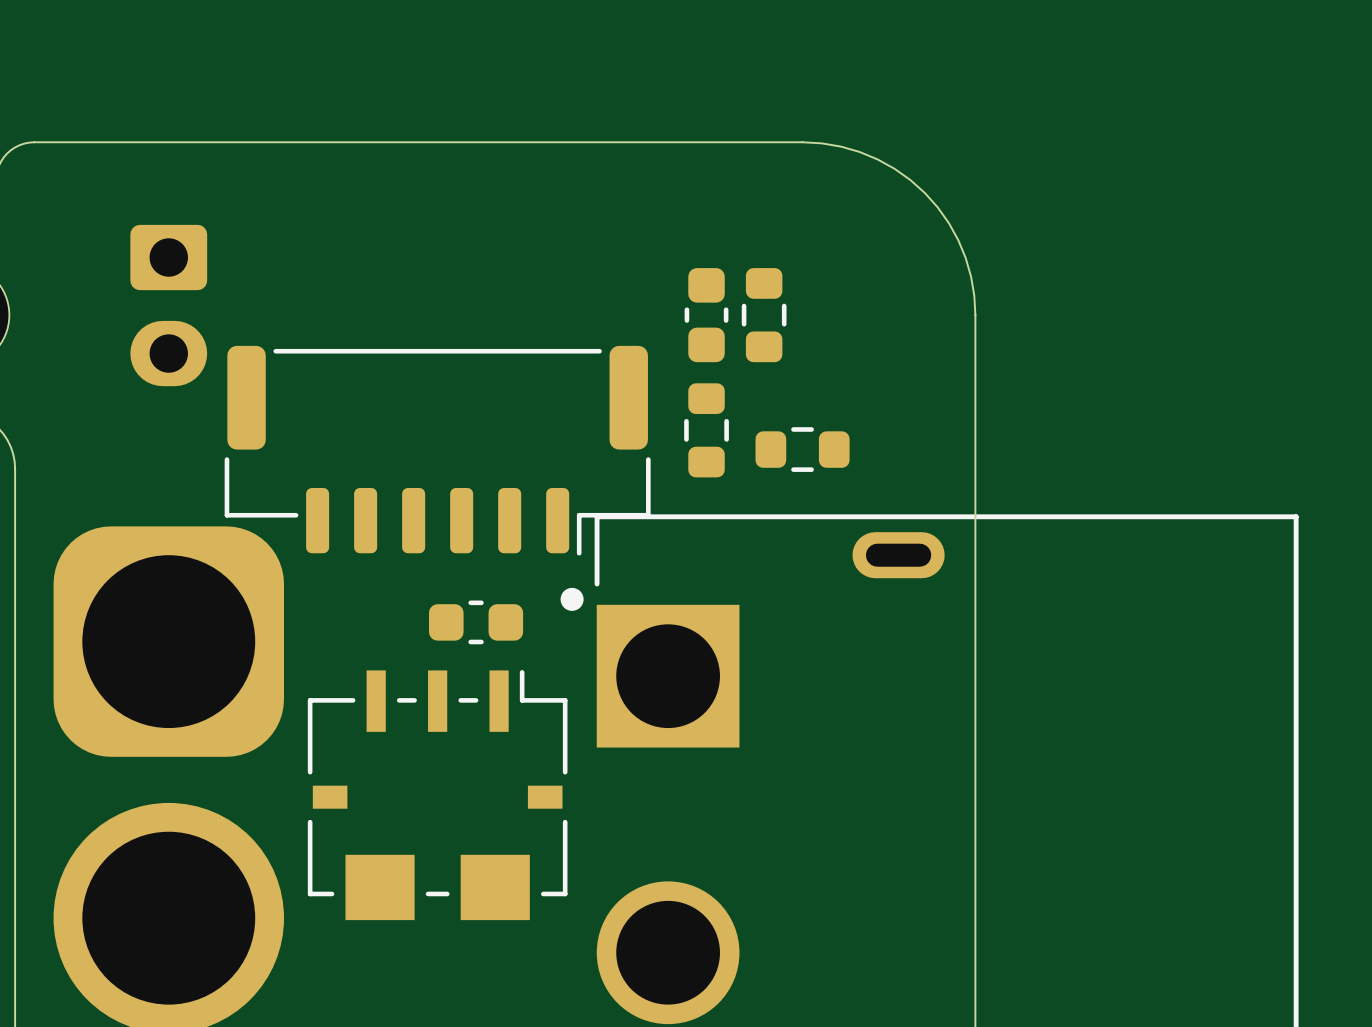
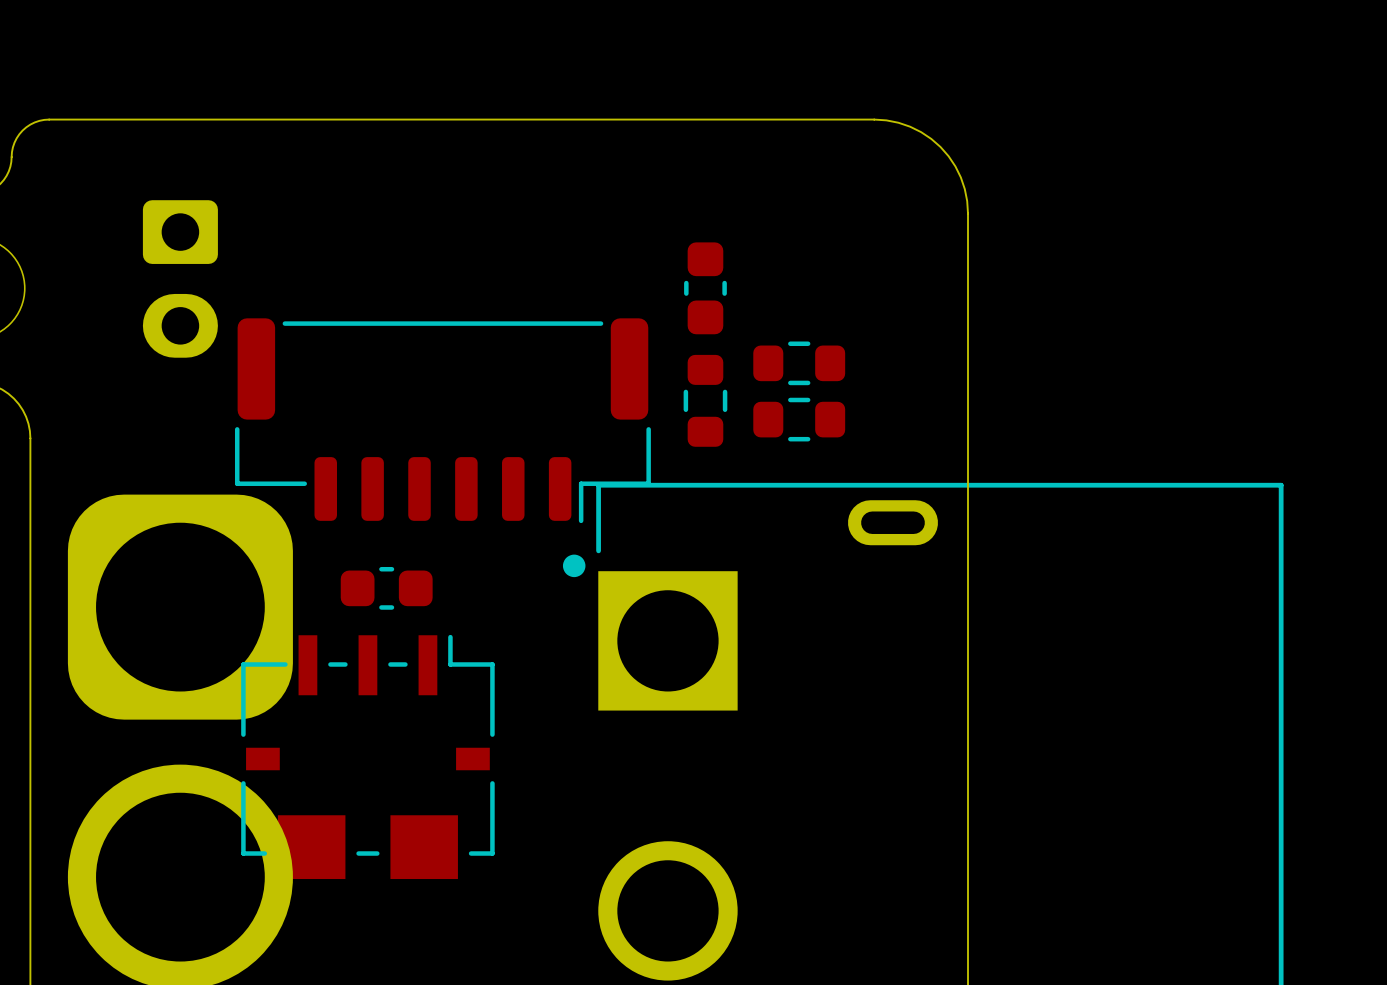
board edge: (802, 142) (841, 146) (877, 159) (894, 168) (924, 192) (948, 223) (958, 240) (971, 276) (975, 315) -> (799, 119) (886, 120) (898, 122) (921, 132) (940, 147) (955, 166) (964, 189) (967, 201) (967, 288)
part rotation: 0° (764, 315) -> 90° clockwise (799, 363)
part position: (764, 315) -> (799, 363)
part position: (476, 622) -> (386, 588)
part position: (437, 795) -> (367, 756)

